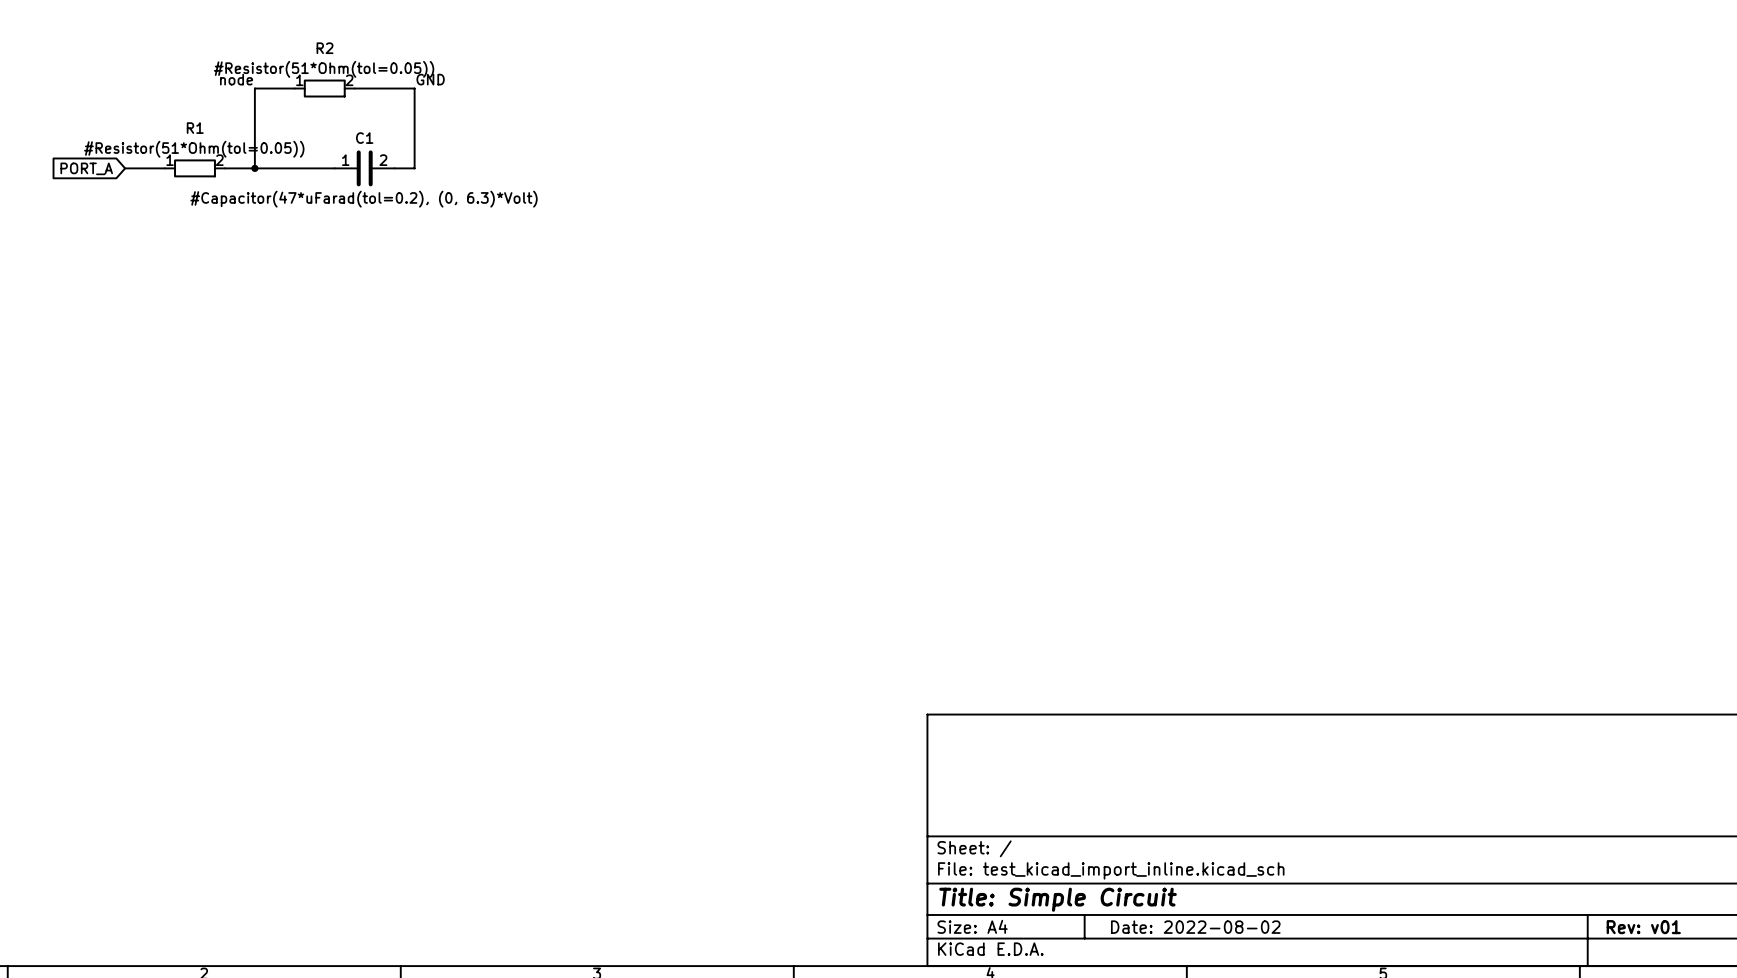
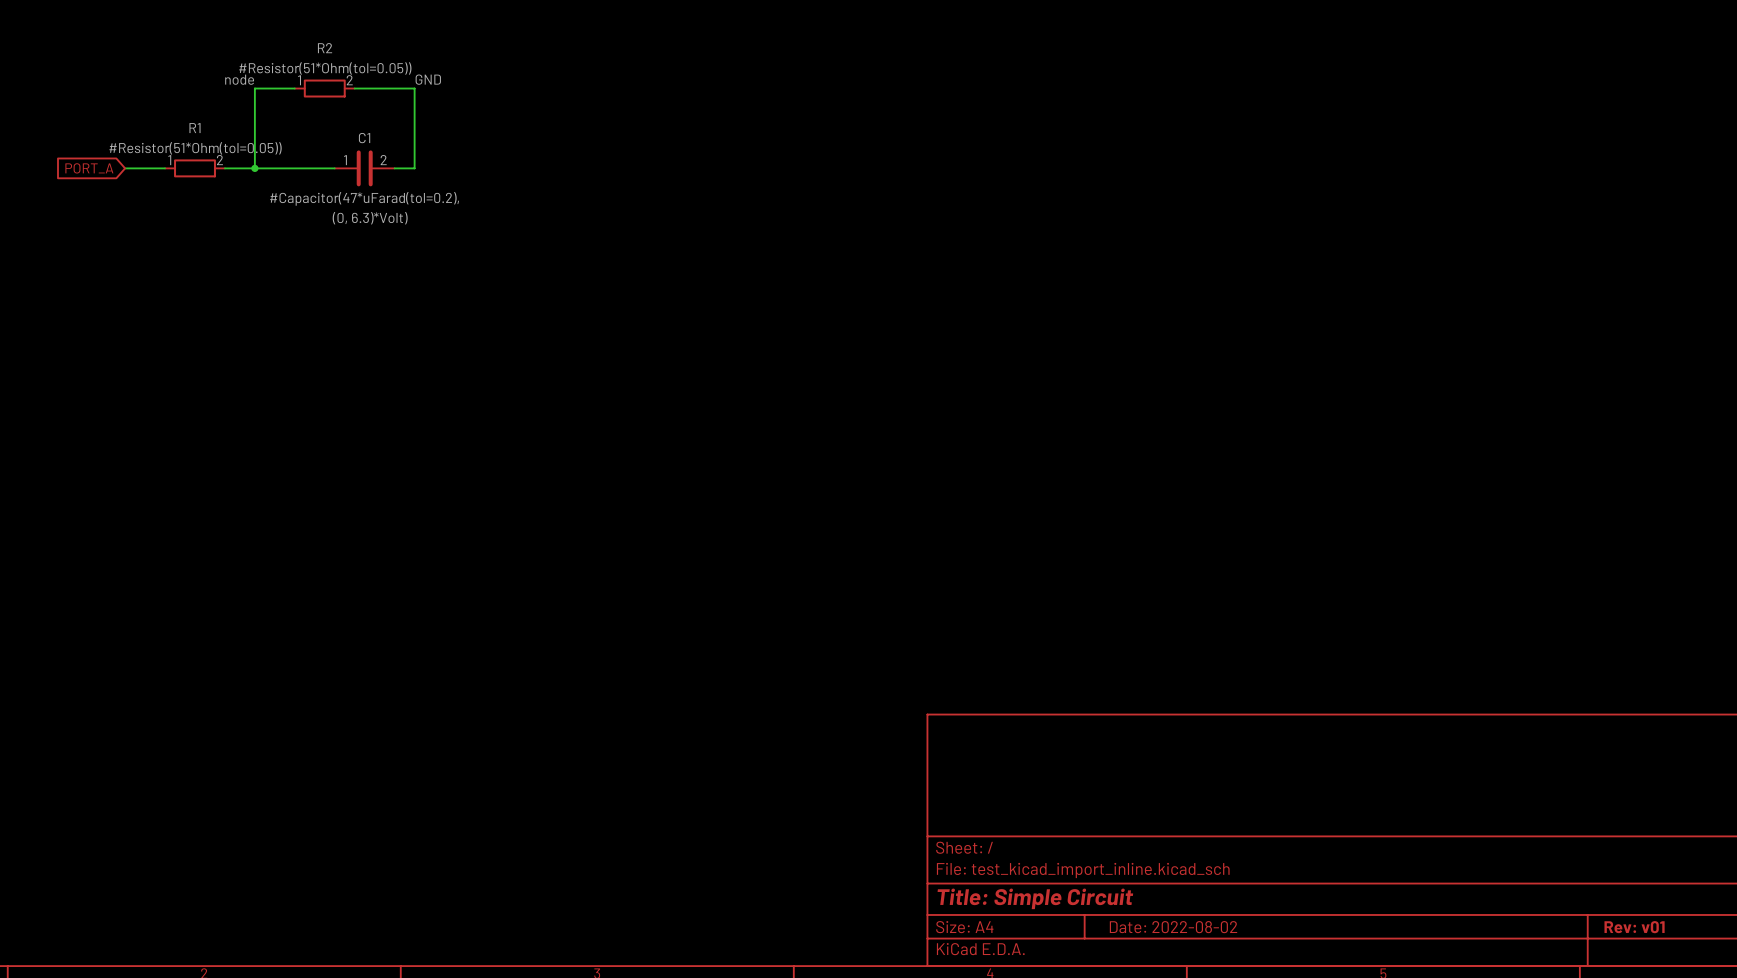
C1 value: #Capacitor(47*uFarad(tol=0.2), (0, 6.3)*Volt) (363, 199) -> #Capacitor(47*uFarad(tol=0.2), (364, 198)
C1 text: none -> (0, 6.3)*Volt) (370, 218)

